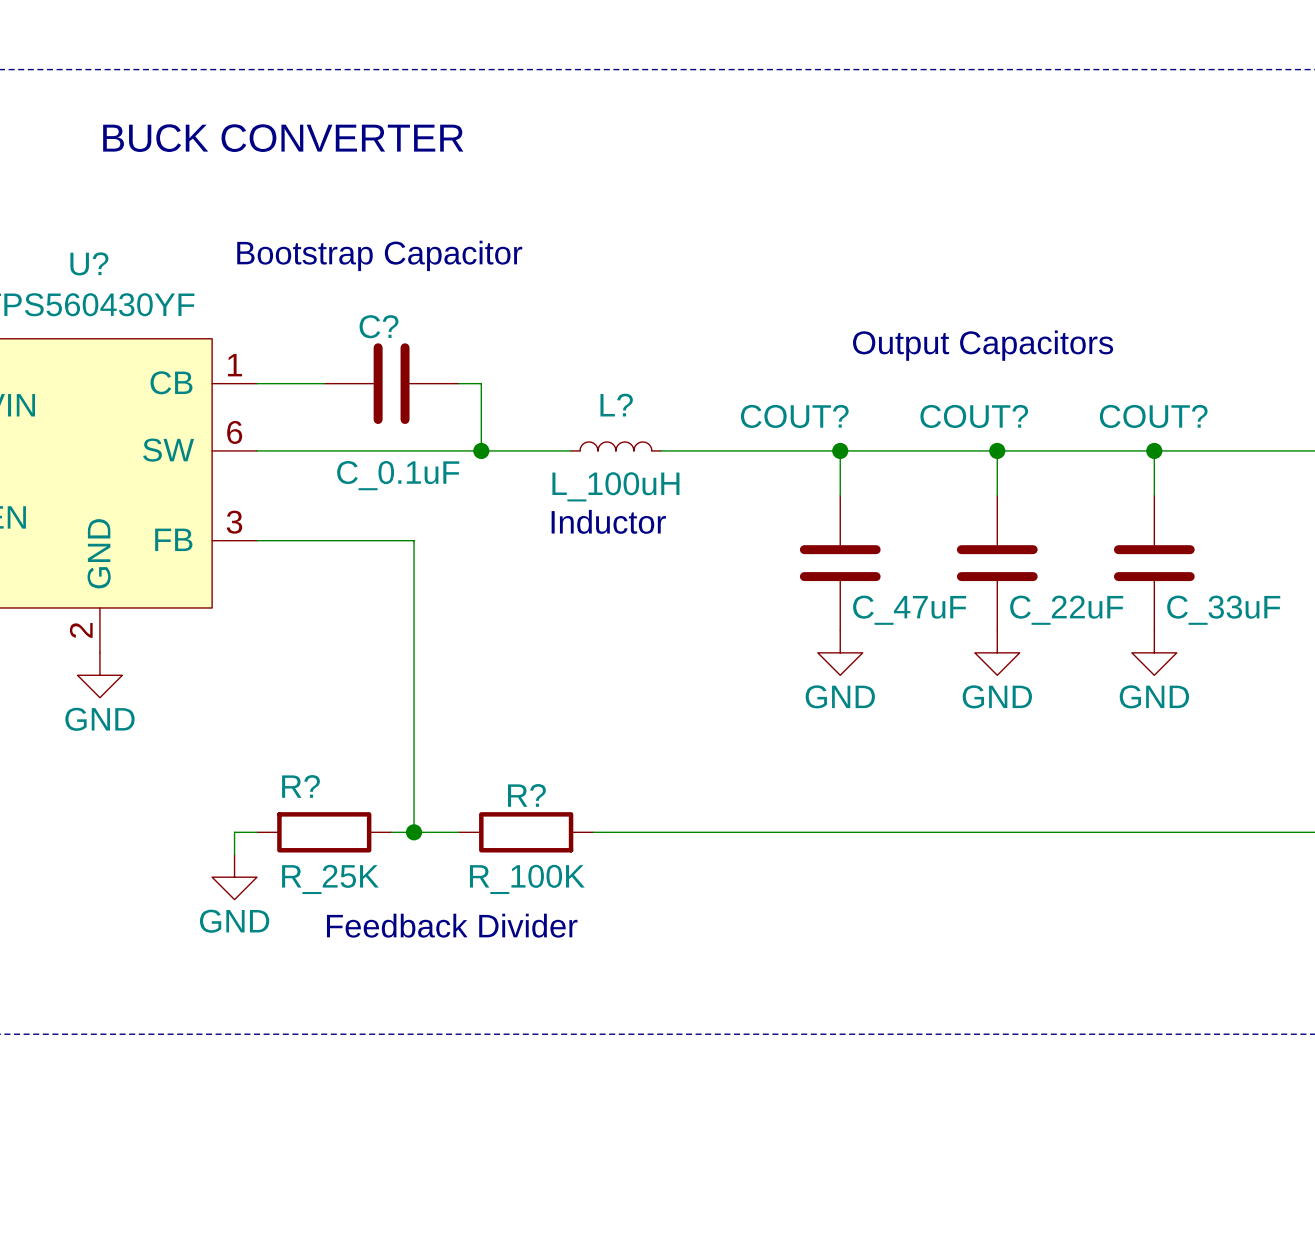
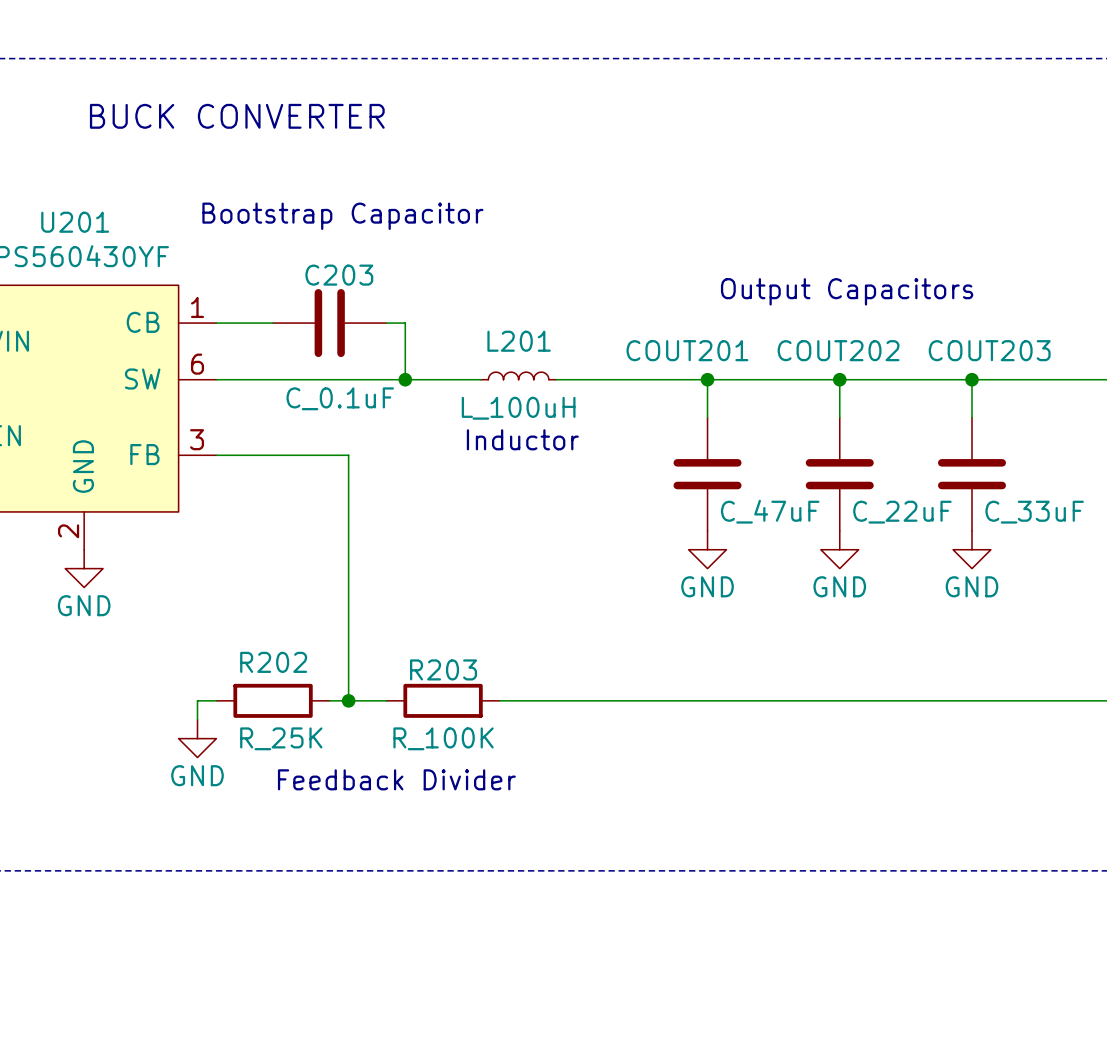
U? name: U? (89, 263) -> U201 (75, 222)
C? name: C? (379, 326) -> C203 (339, 275)
L? name: L? (616, 405) -> L201 (519, 341)
COUT? name: COUT? (794, 416) -> COUT201 (687, 350)
COUT? name: COUT? (974, 416) -> COUT202 (838, 350)
COUT? name: COUT? (1153, 416) -> COUT203 (989, 350)
R? name: R? (300, 786) -> R202 (273, 662)
R? name: R? (526, 795) -> R203 (443, 669)

